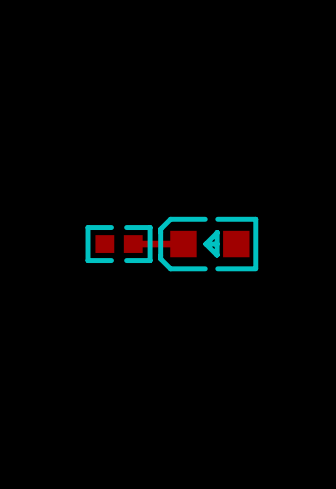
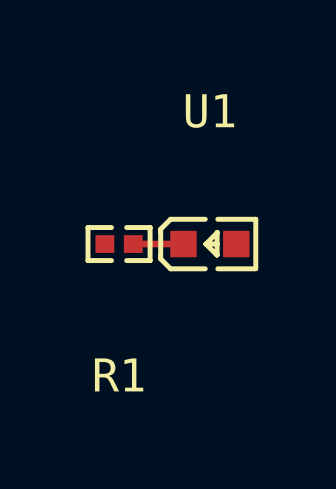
U1 name: none -> U1 (209, 111)
R1 name: none -> R1 (119, 374)

